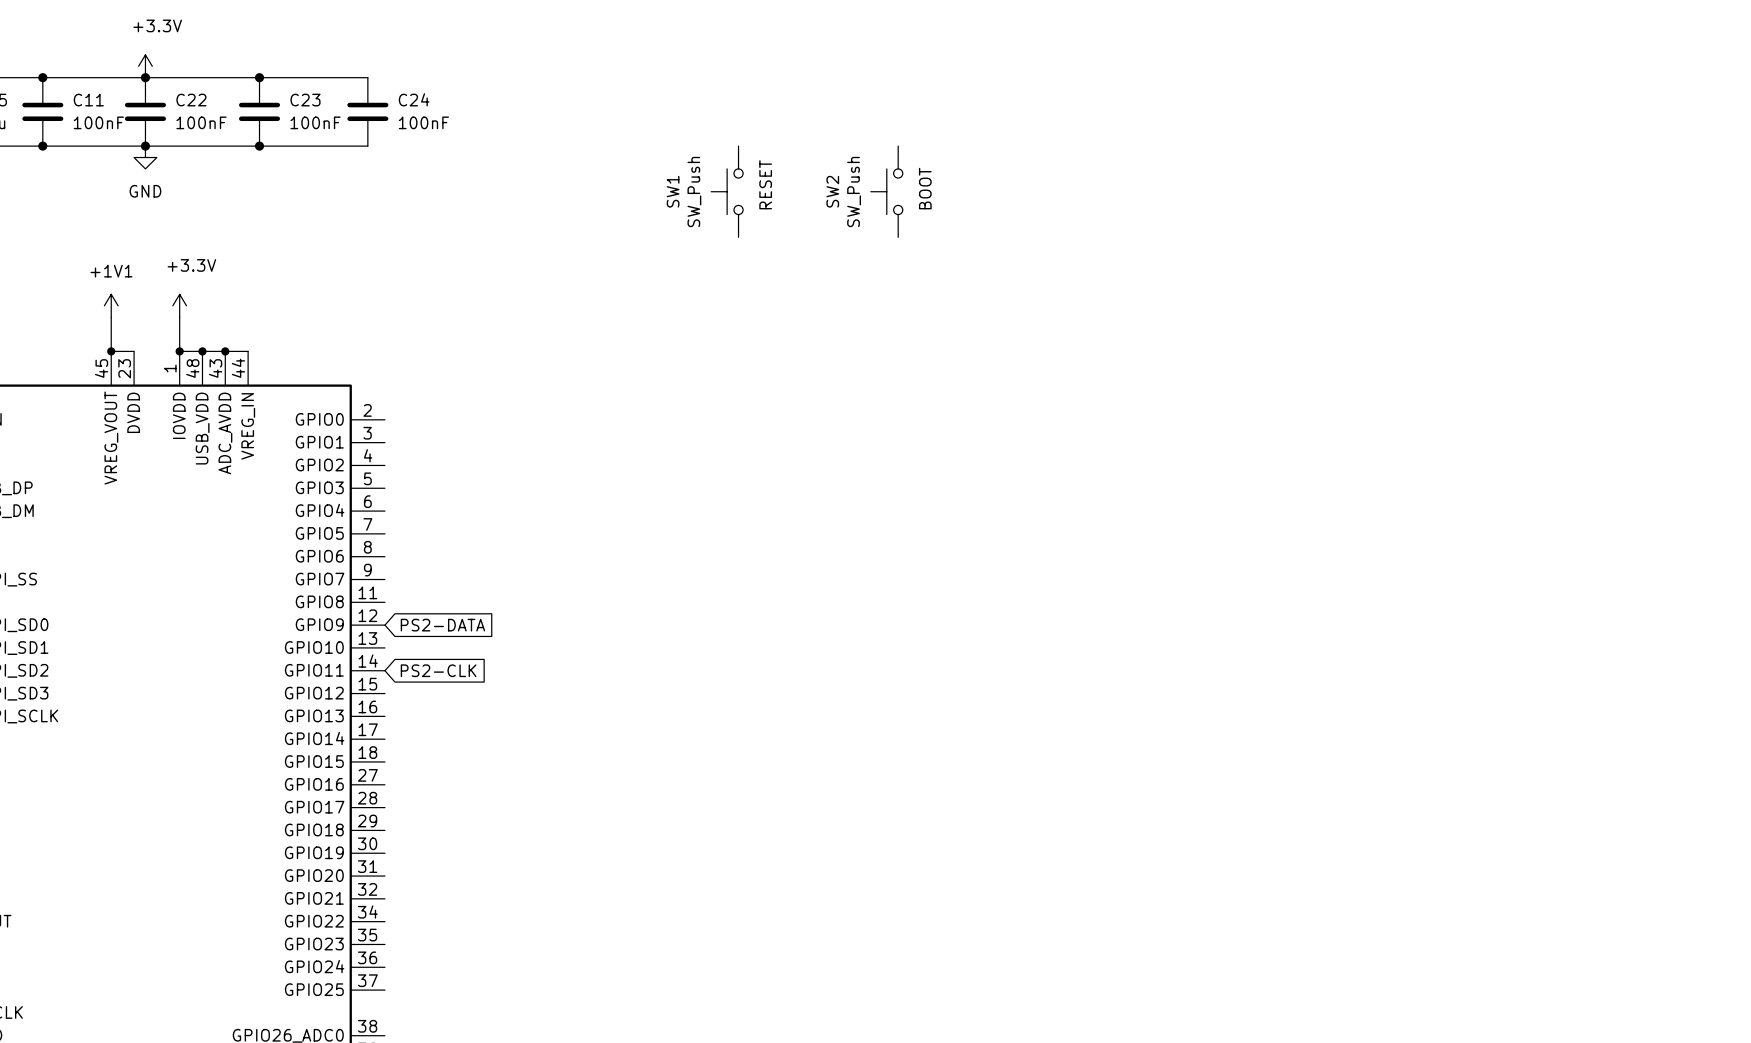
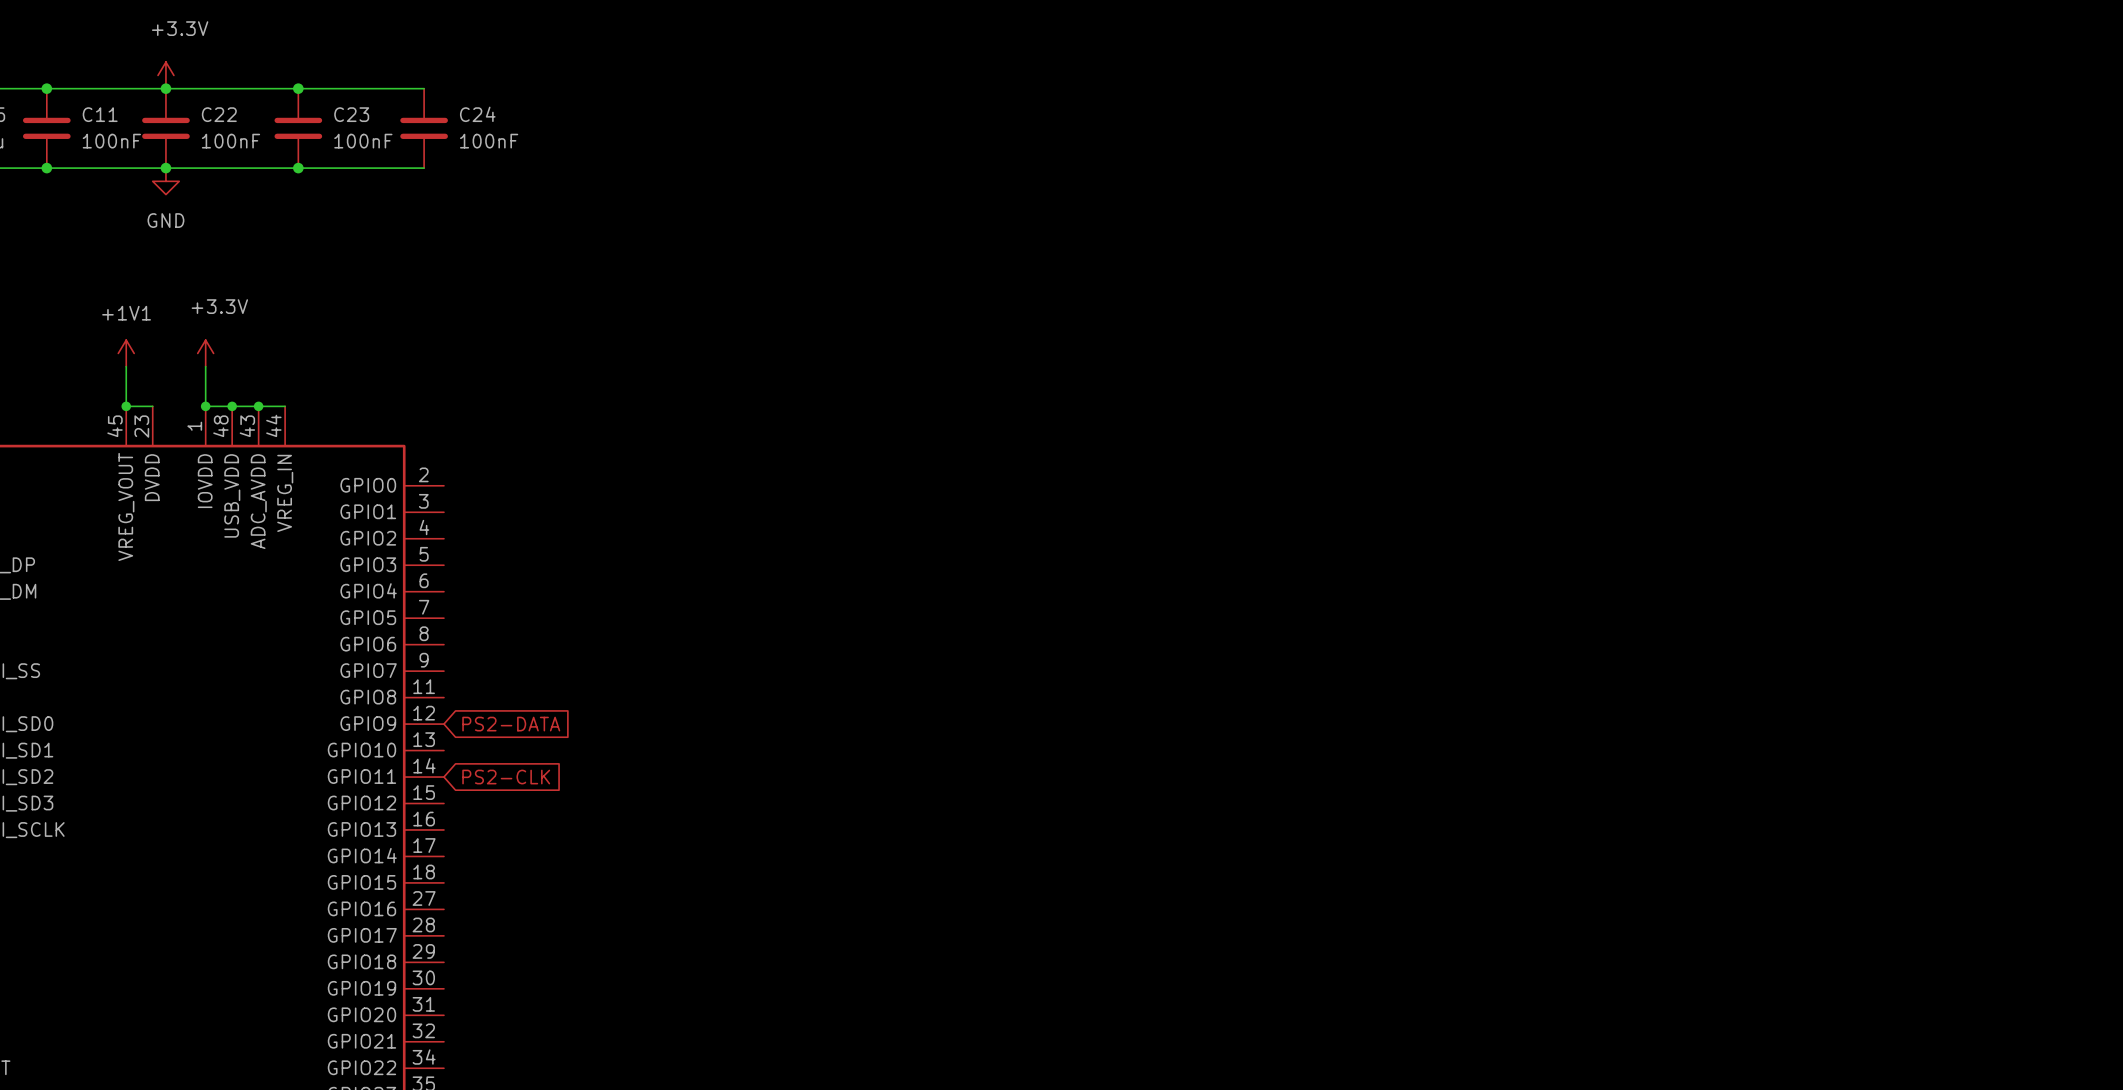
text: RESET (765, 184) -> none
text: BOOT (925, 188) -> none
SW1: SW_Push (727, 191) -> none
SW2: SW_Push (886, 191) -> none

